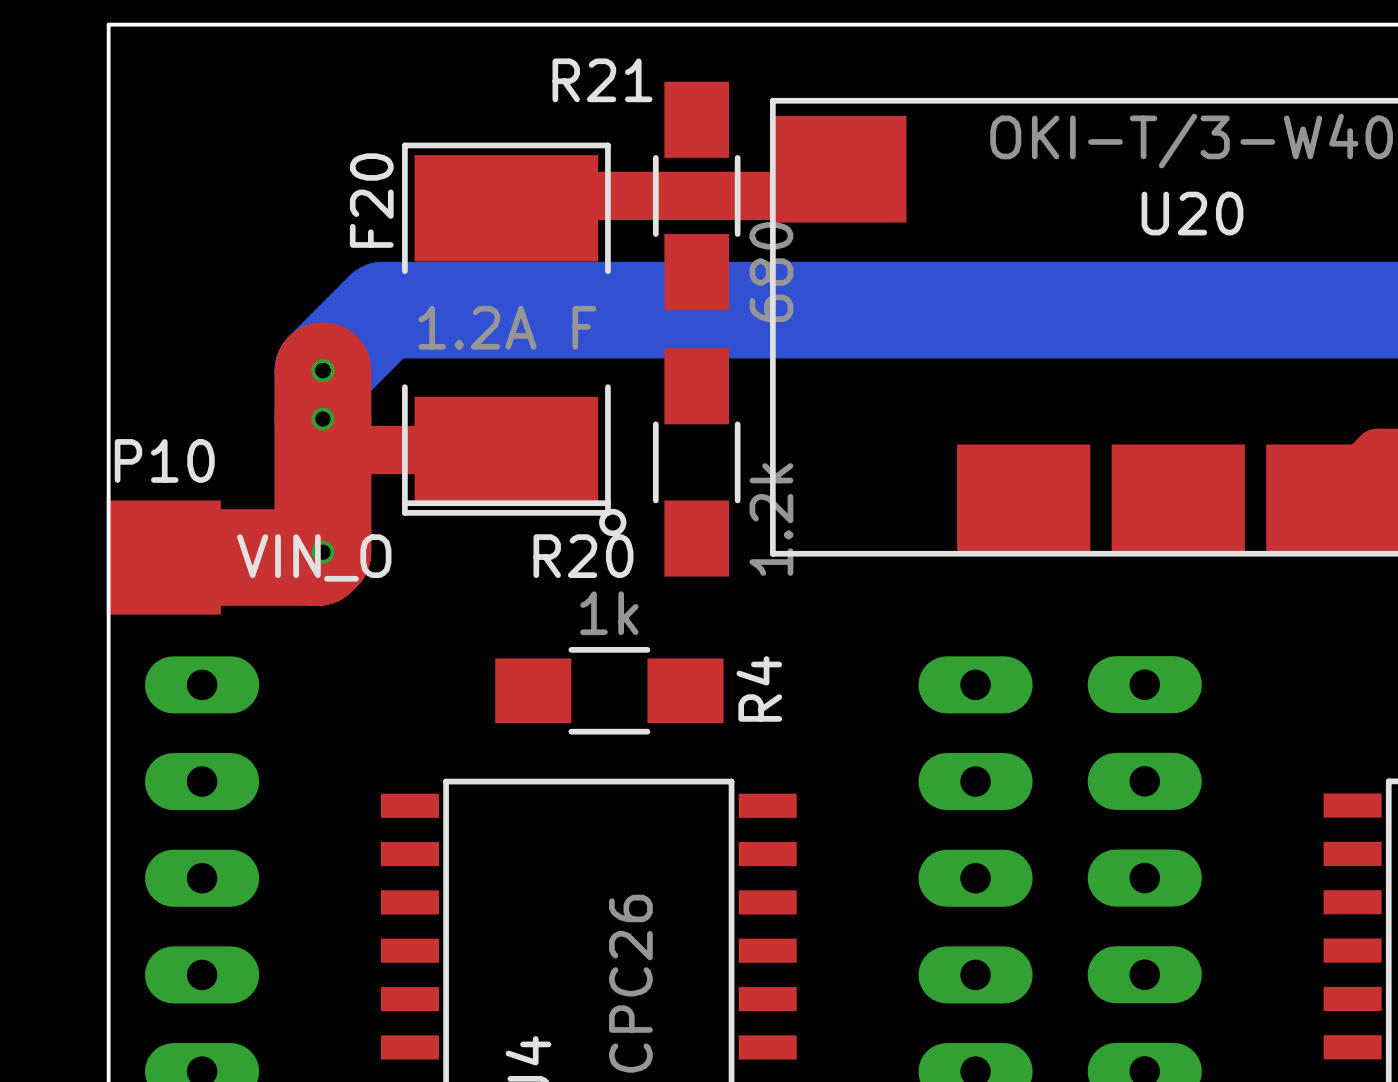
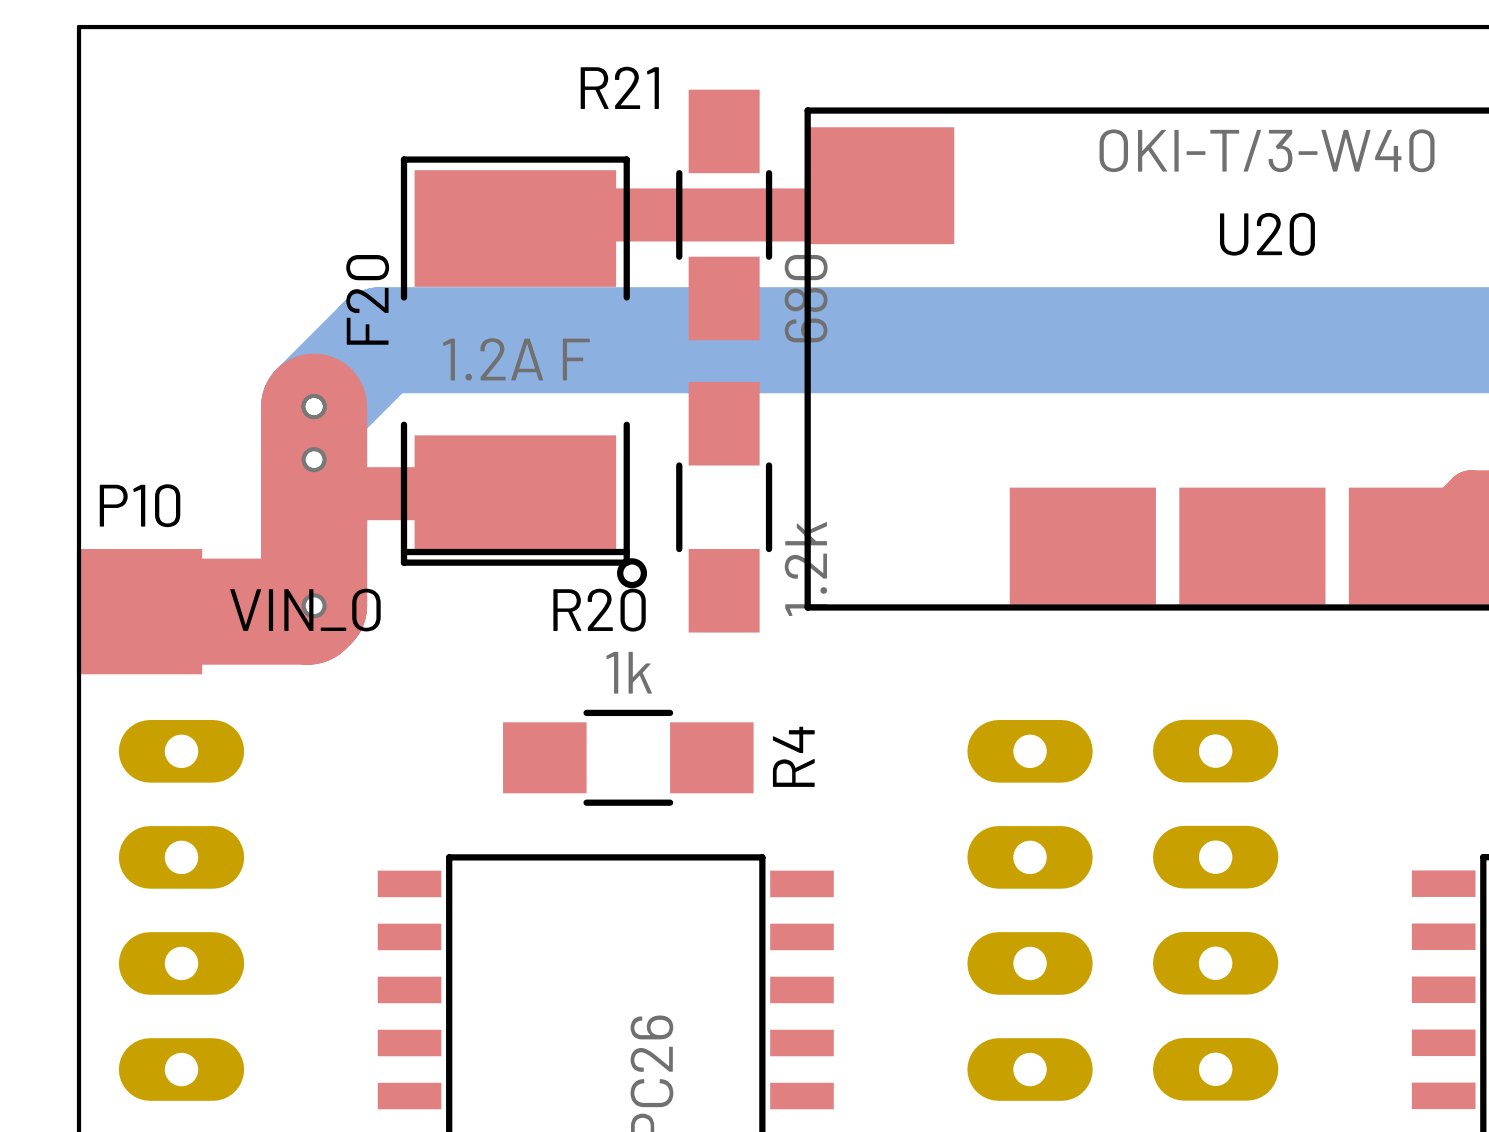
F20 name position: F20 (371, 200) -> F20 (367, 299)

